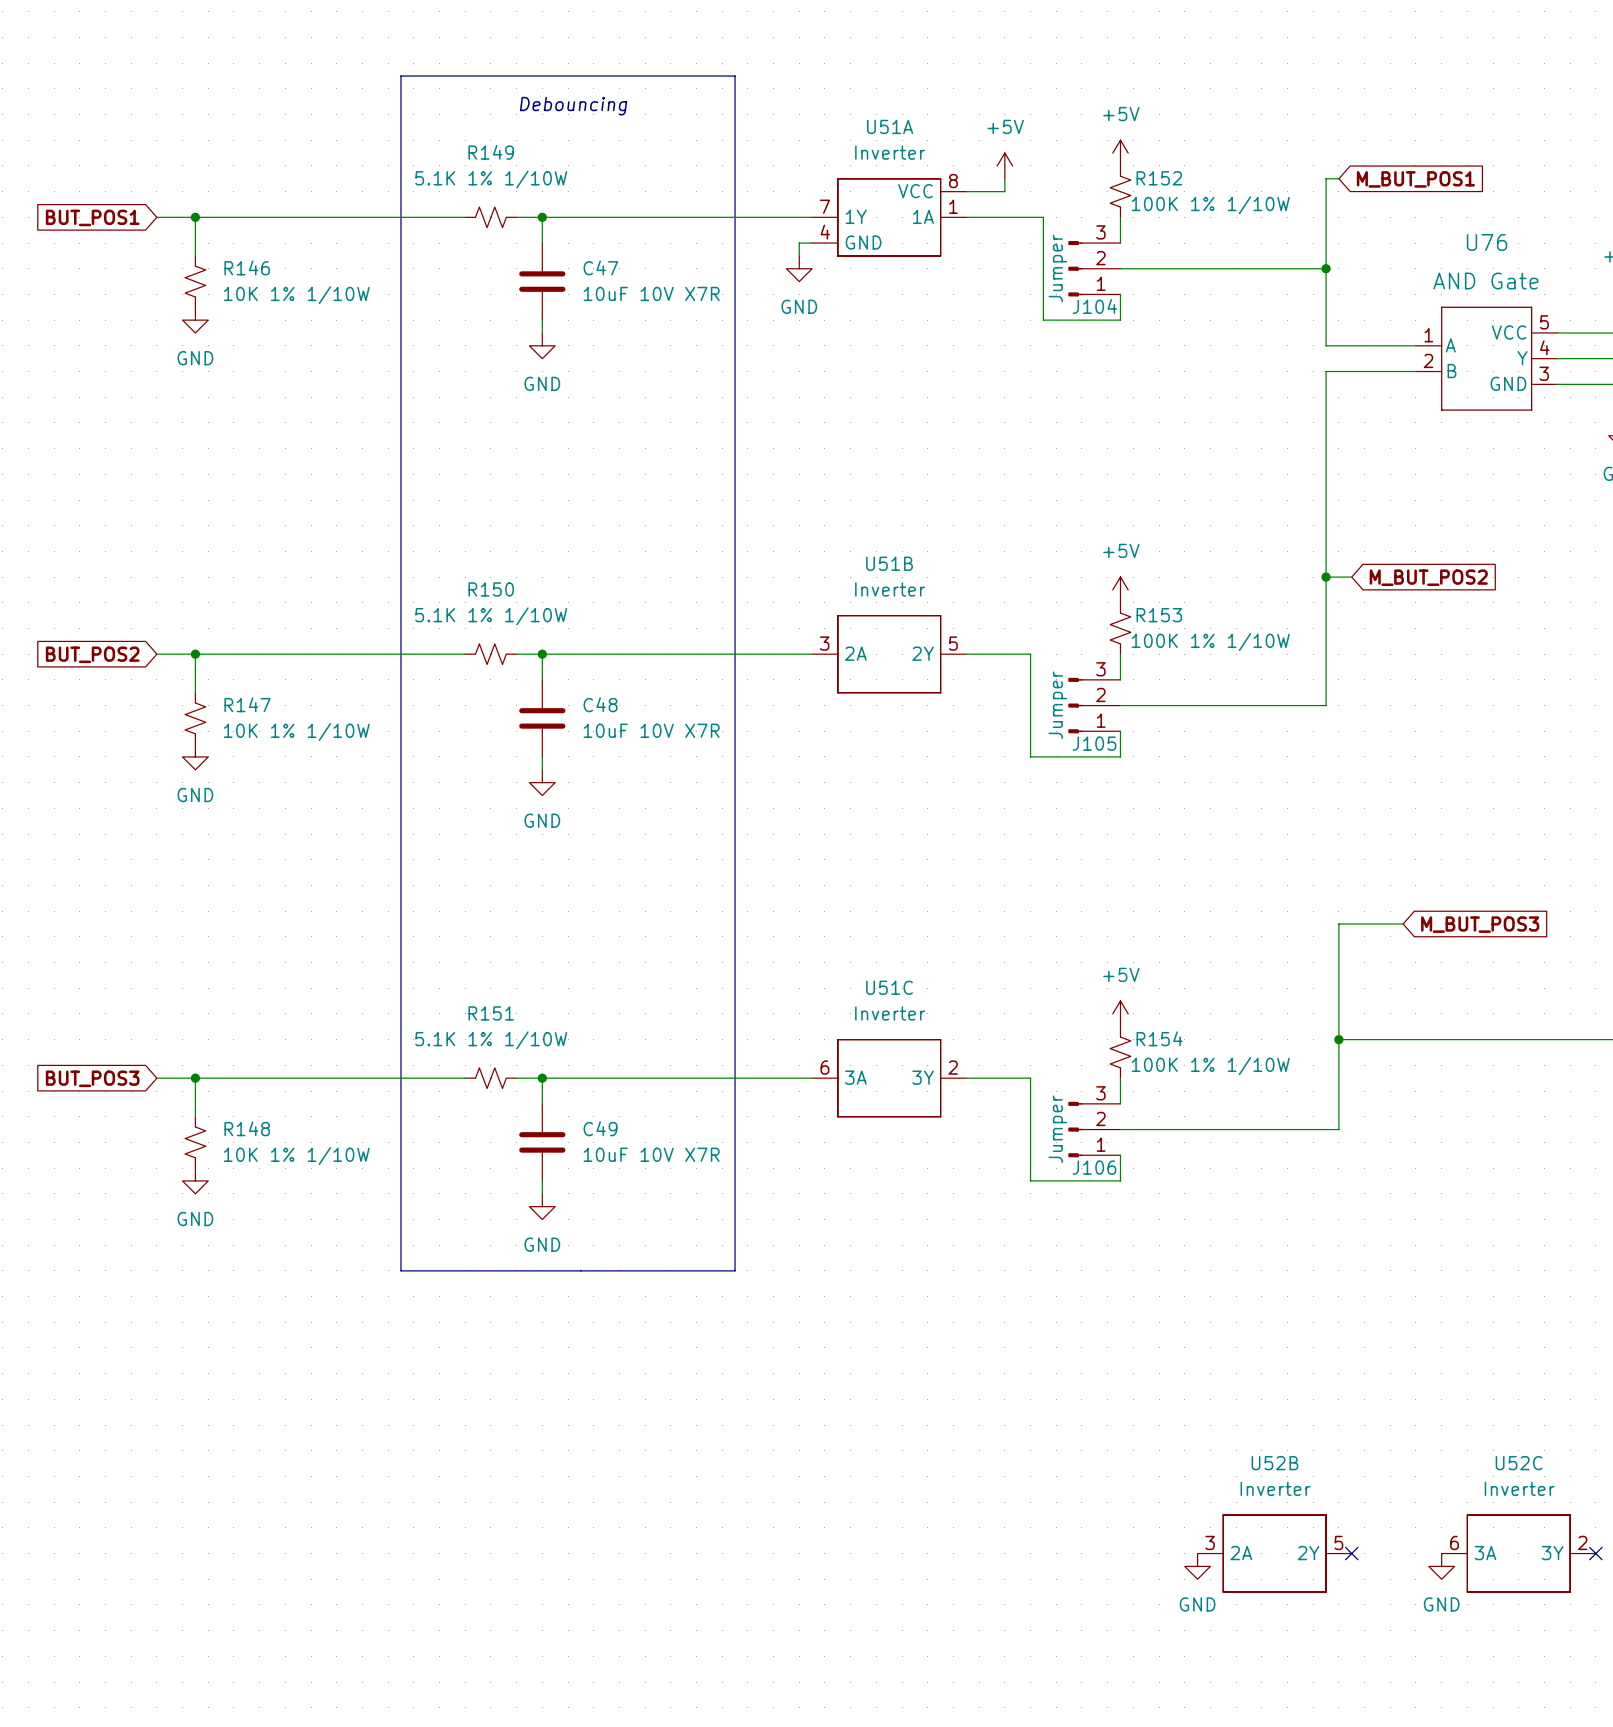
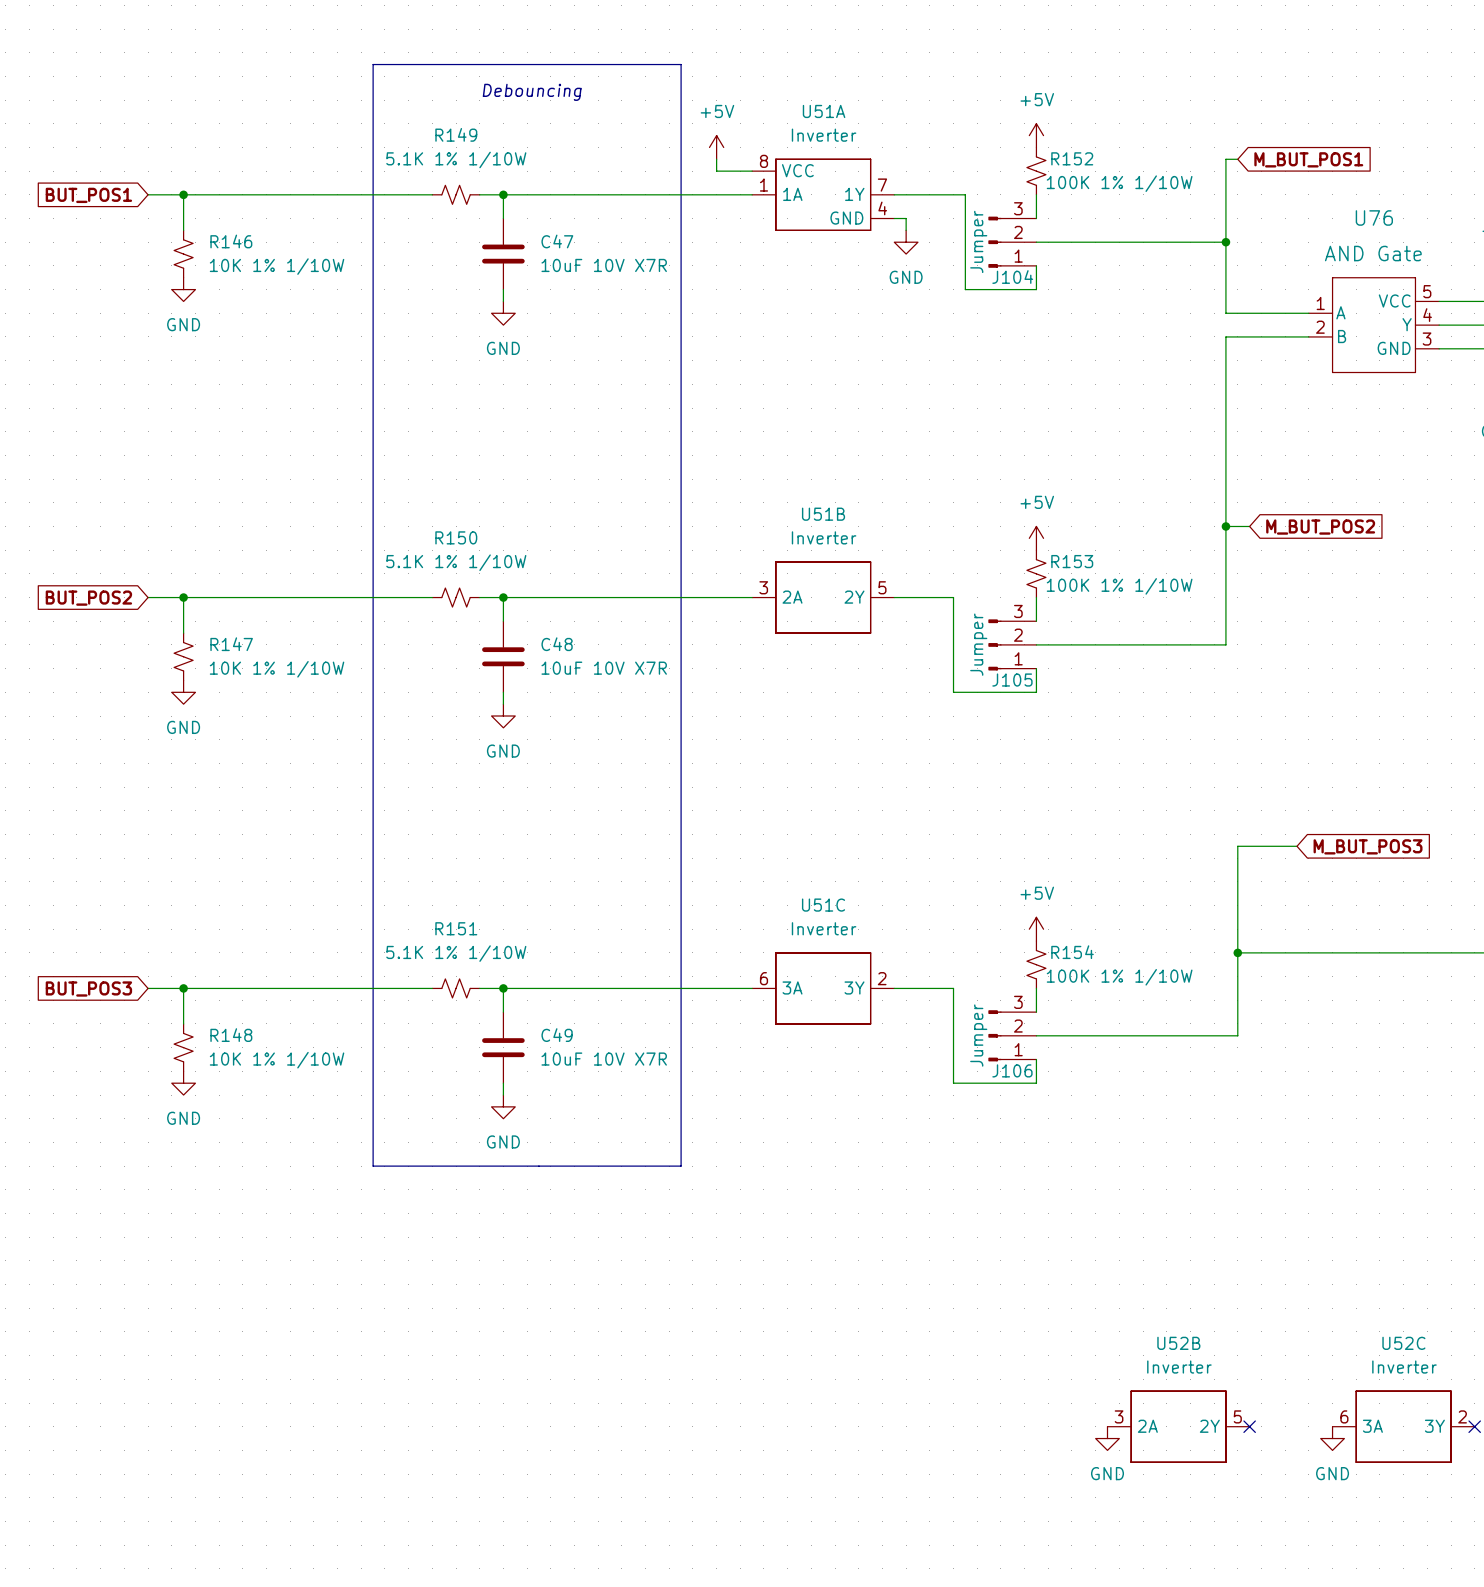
power symbol position: +5V (1004, 165) -> +5V (716, 147)
wire: none -> (716, 159) (716, 171) (752, 171)
wire: (1004, 178) (1004, 191) (966, 191) -> none
U51A flip: as is (889, 217) -> left-right (823, 194)
wire: (812, 243) (799, 243) (799, 255) -> none
wire: none -> (894, 218) (906, 218) (906, 230)
power symbol position: GND (799, 268) -> GND (906, 242)

